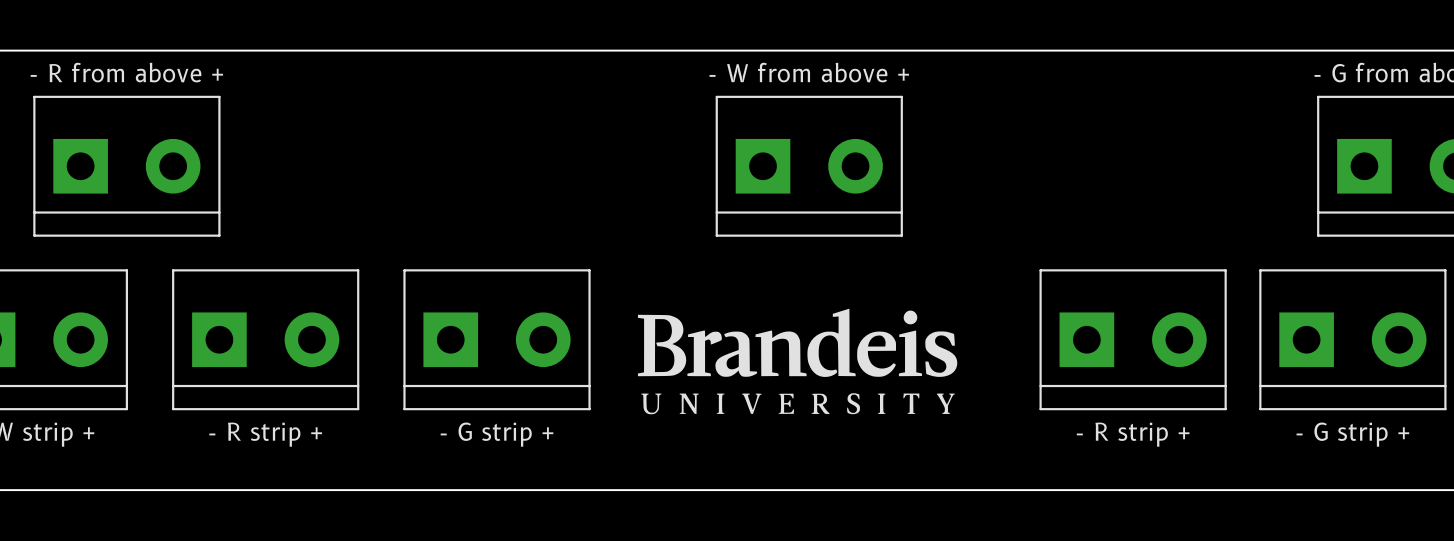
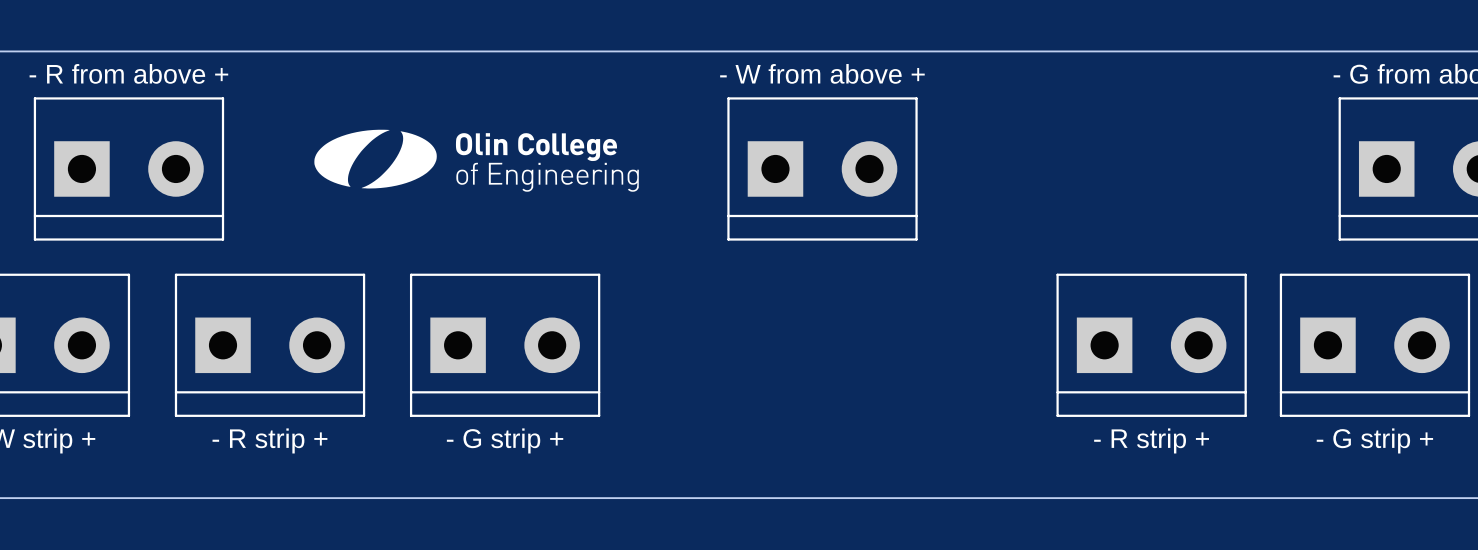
drawing: none -> [314, 129, 639, 192]
drawing: [637, 308, 958, 415] -> none

